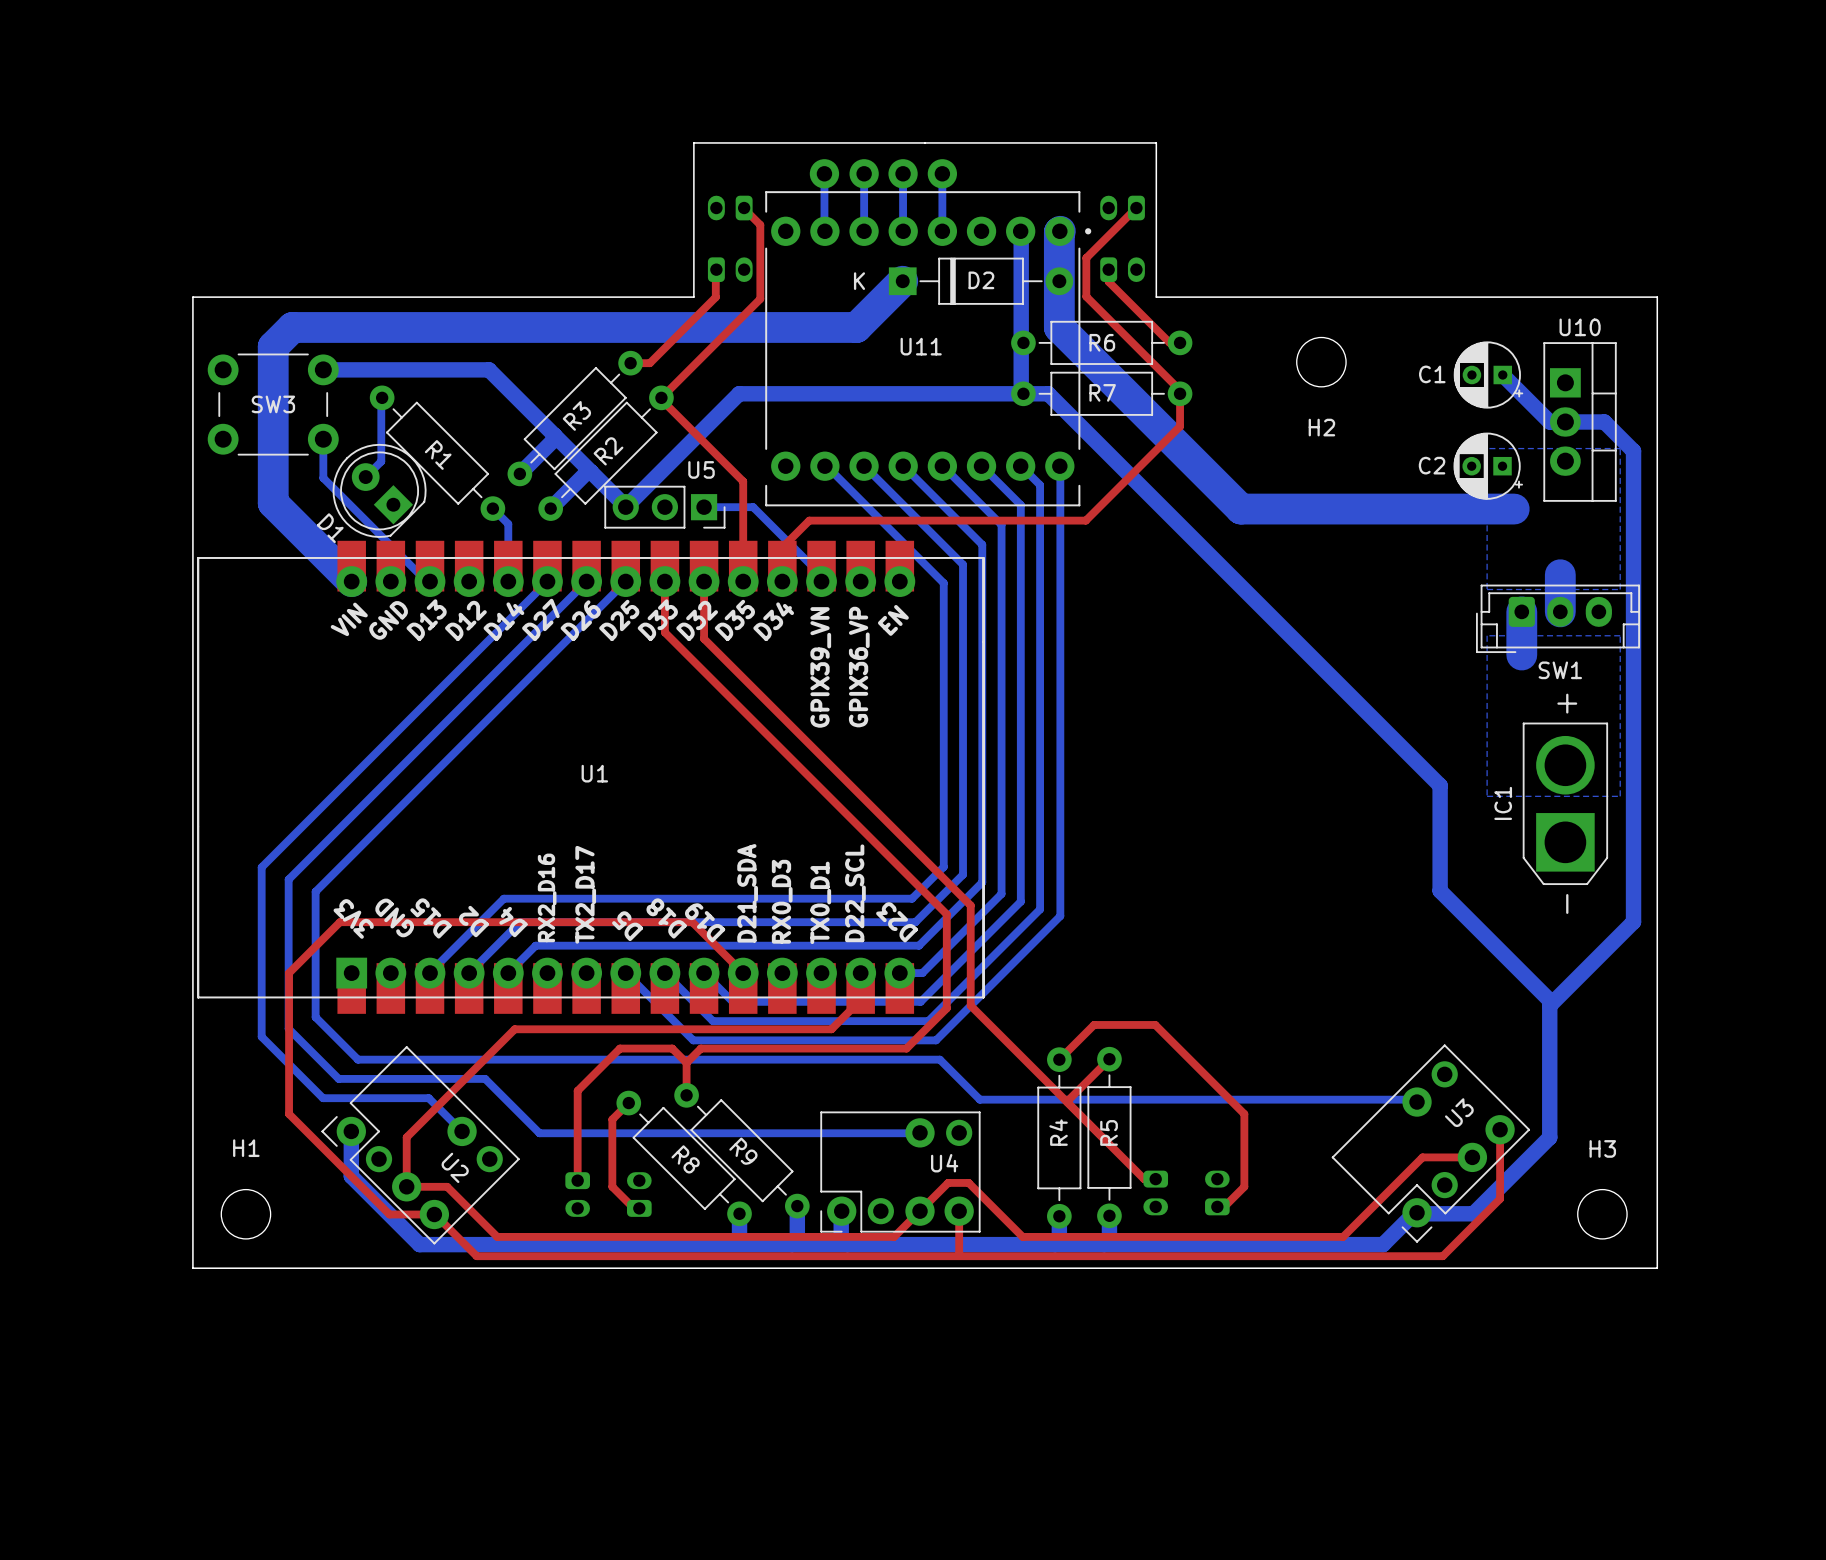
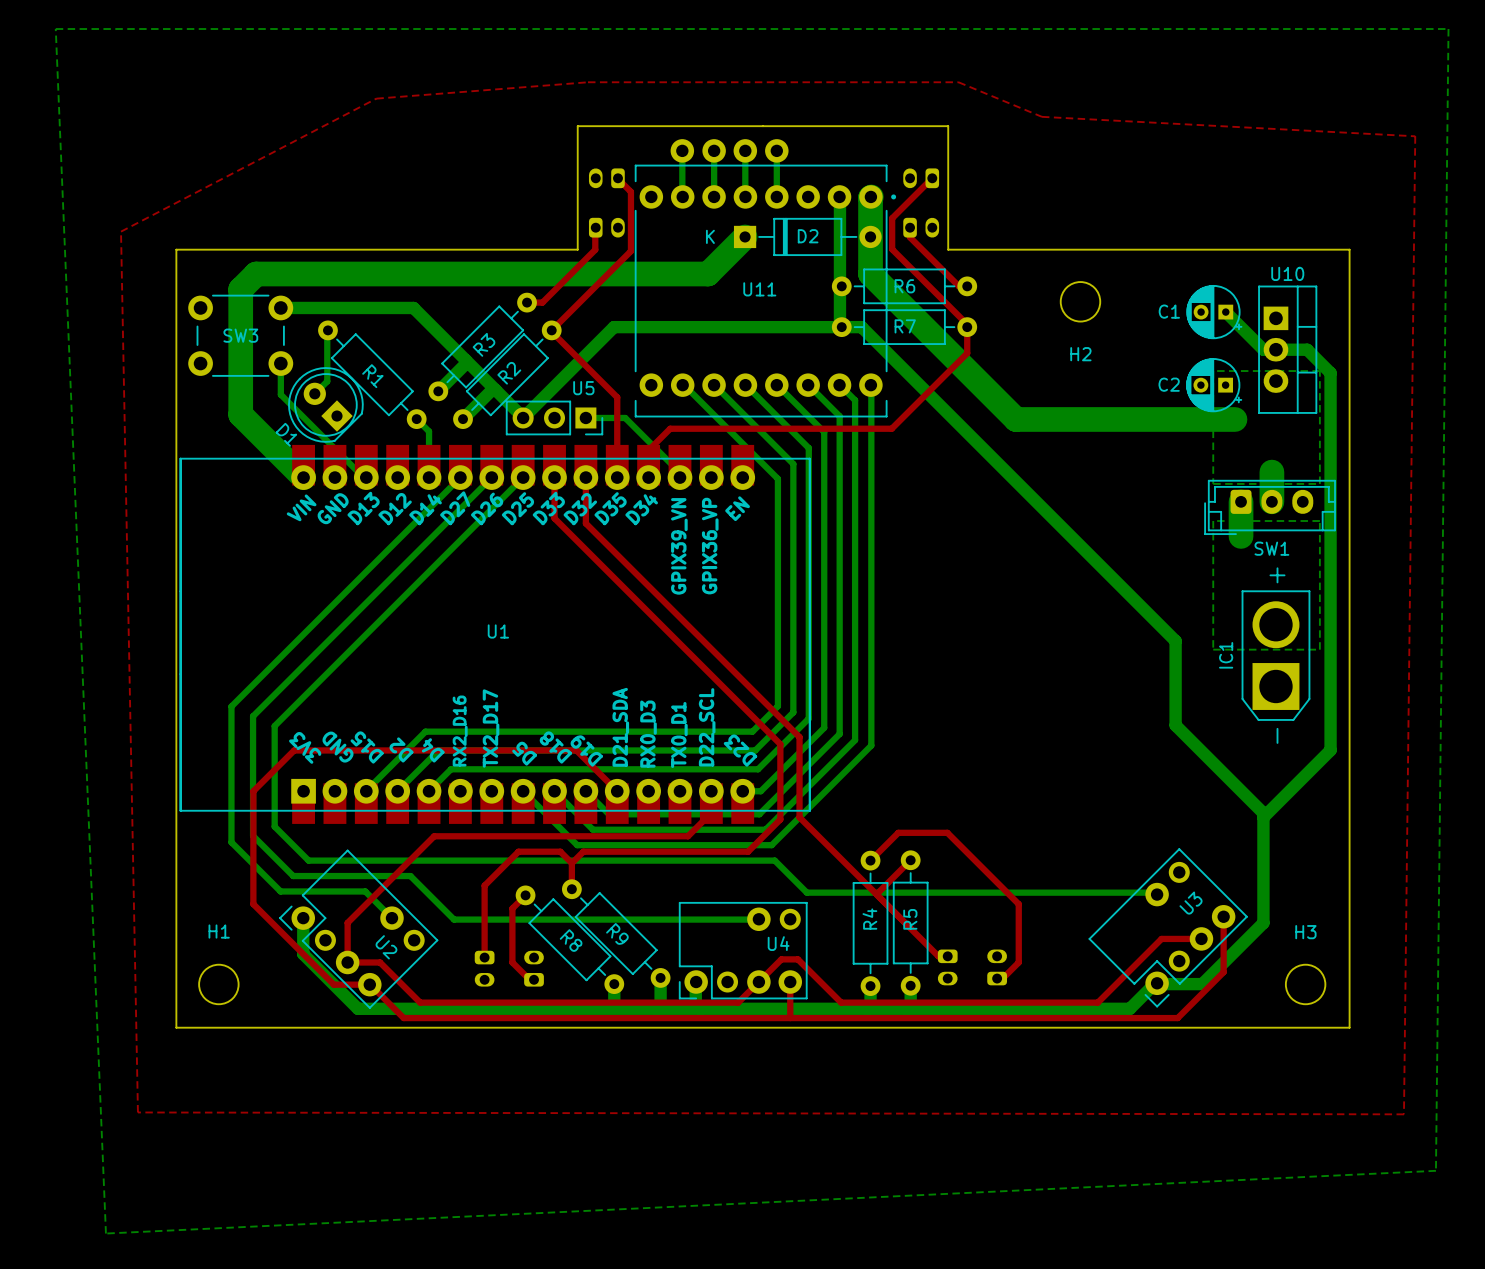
bottom zone outline: none -> (55, 29) (1448, 29) (1435, 1170) (105, 1233) (55, 29)
top zone outline: none -> (588, 82) (376, 98) (121, 231) (137, 1112) (1403, 1114) (1415, 136) (1041, 116) (958, 82) (588, 82)

